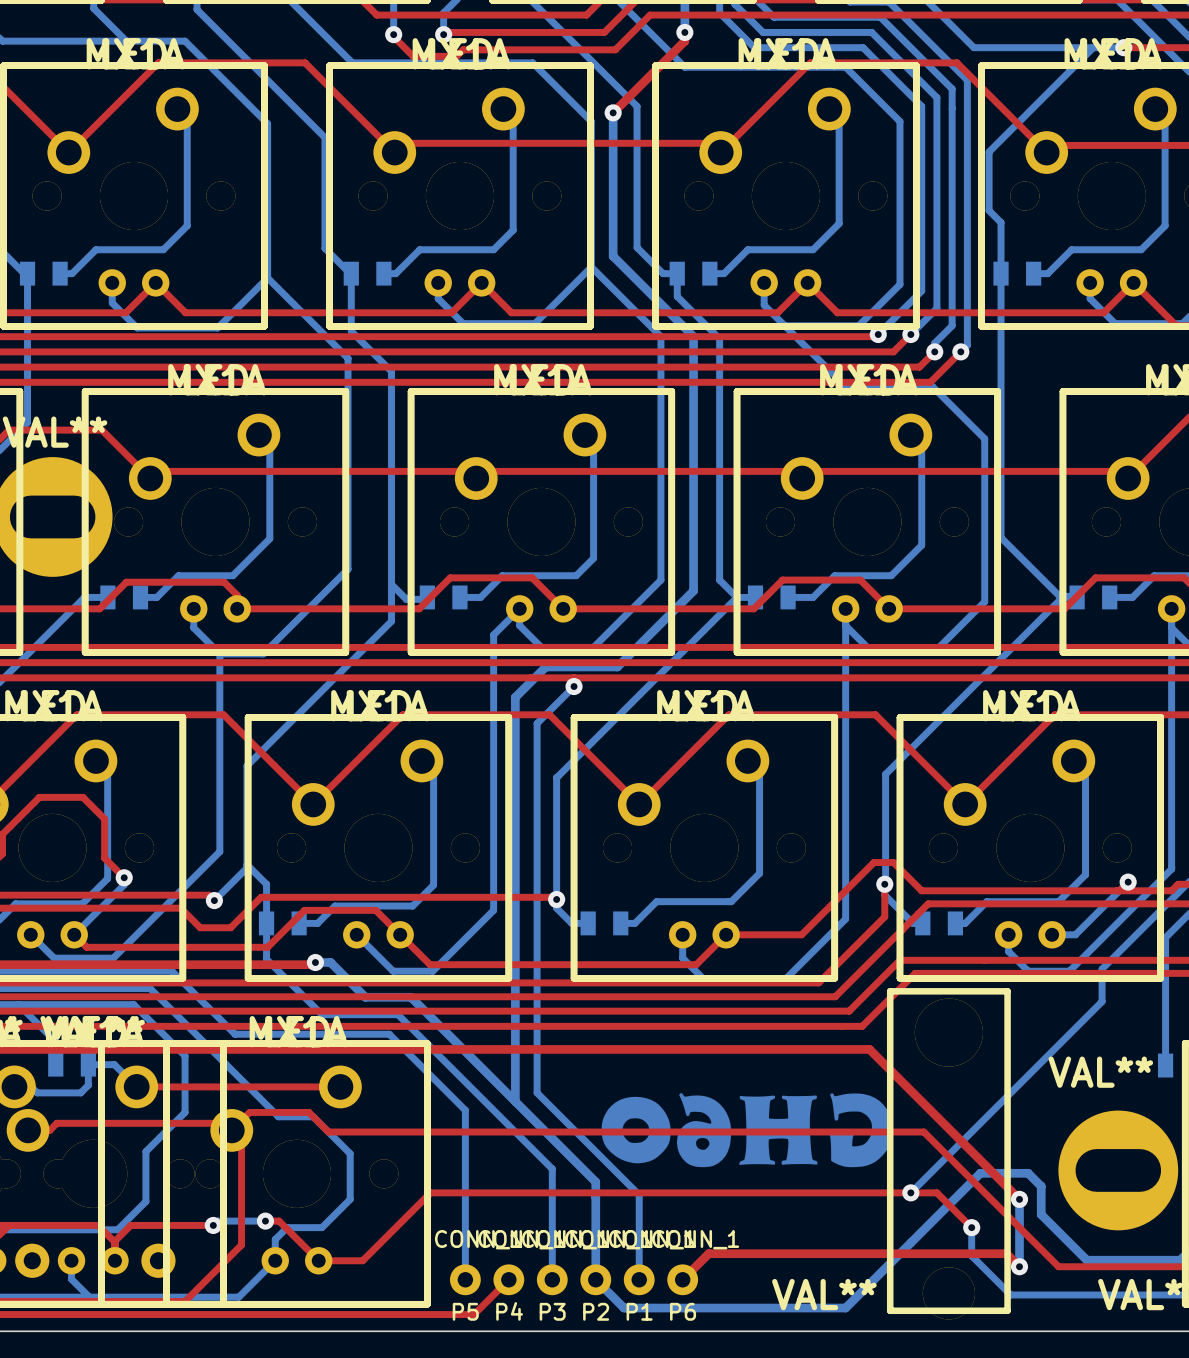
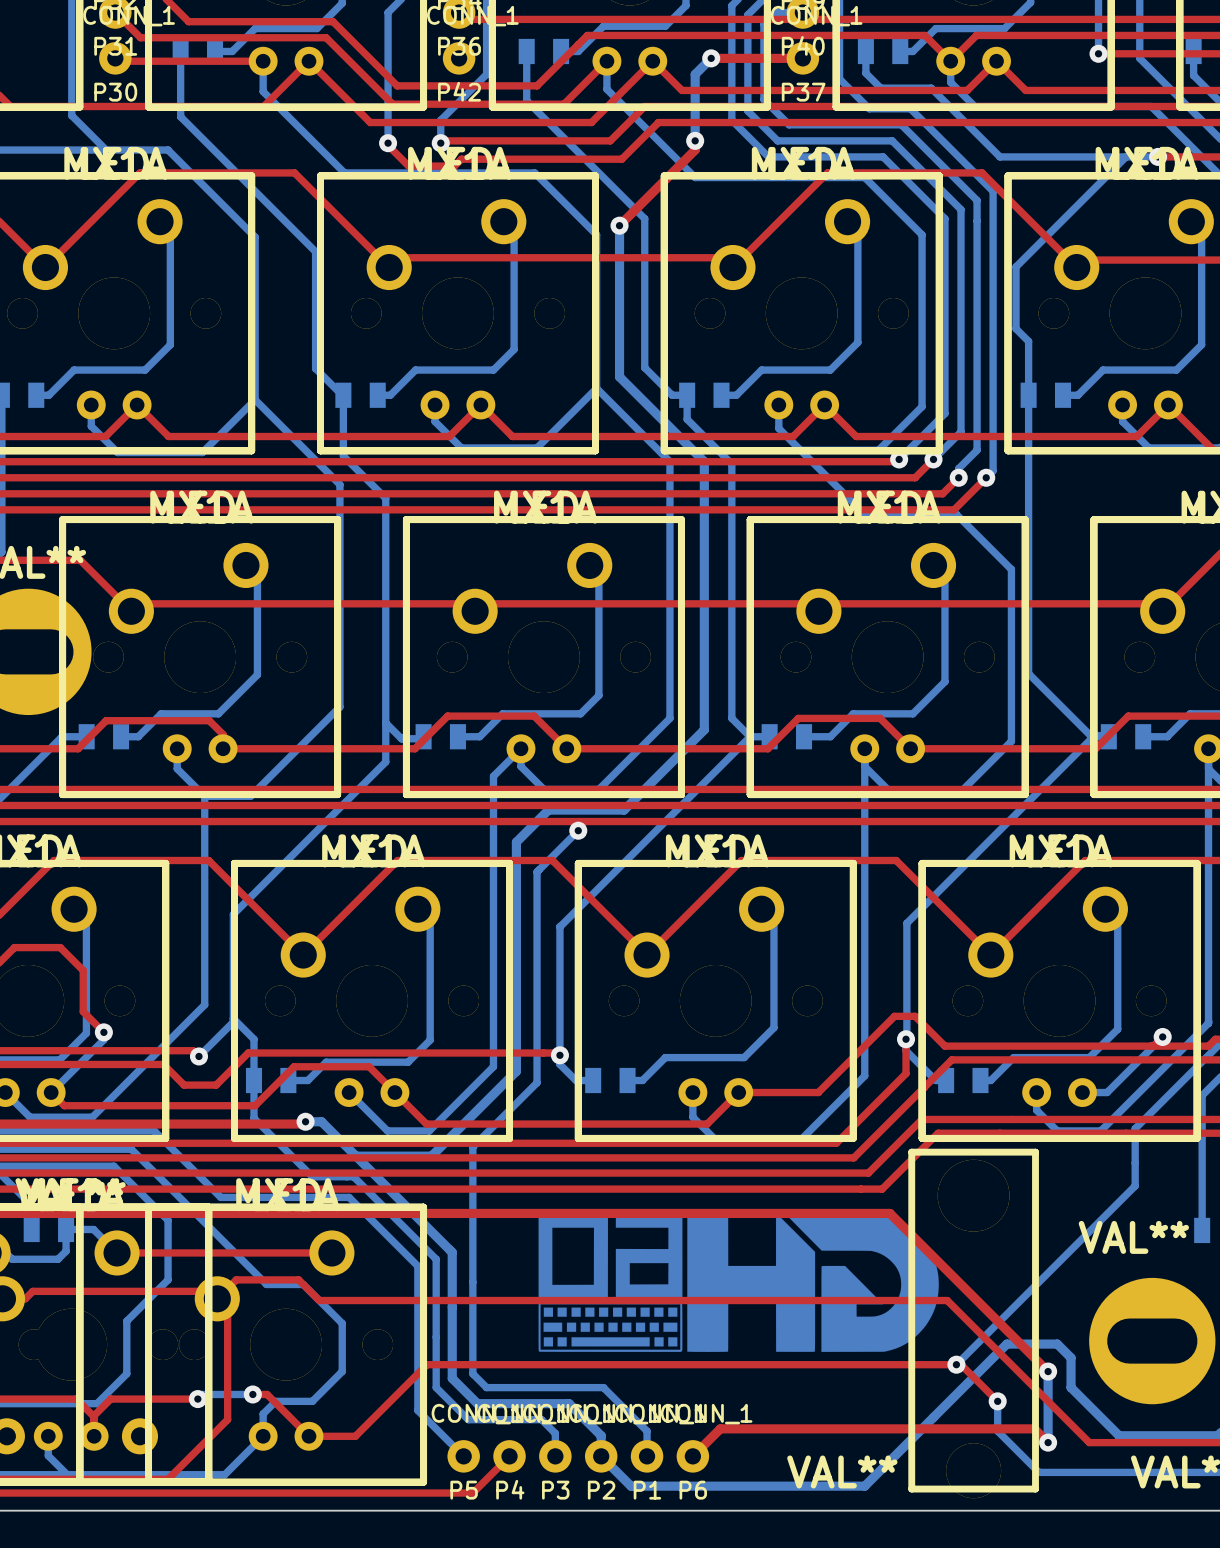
bottom track: (537, 723) (537, 1092) (639, 1195) (639, 1255) -> (539, 869) (537, 871) (537, 1082) (472, 1146) (472, 1373) (486, 1387) (603, 1387) (647, 1431)
bottom track: (515, 914) (515, 1101) -> (516, 1071) (431, 1156) (355, 1156)
bottom track: (365, 997) (411, 997) (595, 1181) (595, 1260) -> (358, 1158) (452, 1252) (452, 1378) (477, 1403) (569, 1403) (601, 1435)
bottom track: (1102, 1001) (910, 1192) -> (1135, 1163) (1135, 1185) (956, 1364)
bottom track: (361, 1014) (398, 1014) (552, 1168) (552, 1258) -> (353, 1176) (436, 1259) (436, 1387) (468, 1419) (541, 1419) (555, 1433)
bottom track: (356, 1034) (389, 1034) (465, 1110) (465, 1279) -> (349, 1197) (417, 1266) (417, 1410) (463, 1456)
drawing: none -> [538, 1213, 939, 1352]
drawing: [601, 1093, 893, 1168] -> none
via position: (910, 1192) -> (956, 1364)

